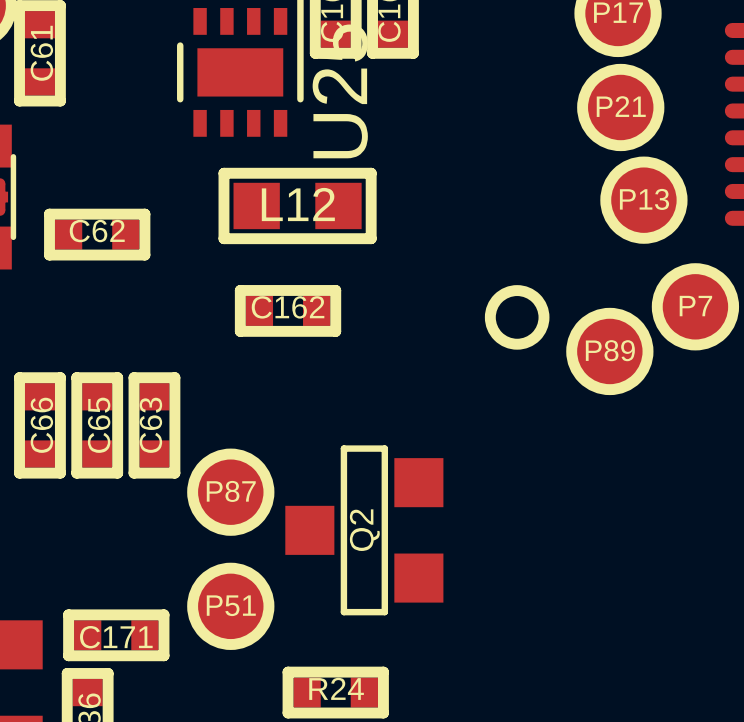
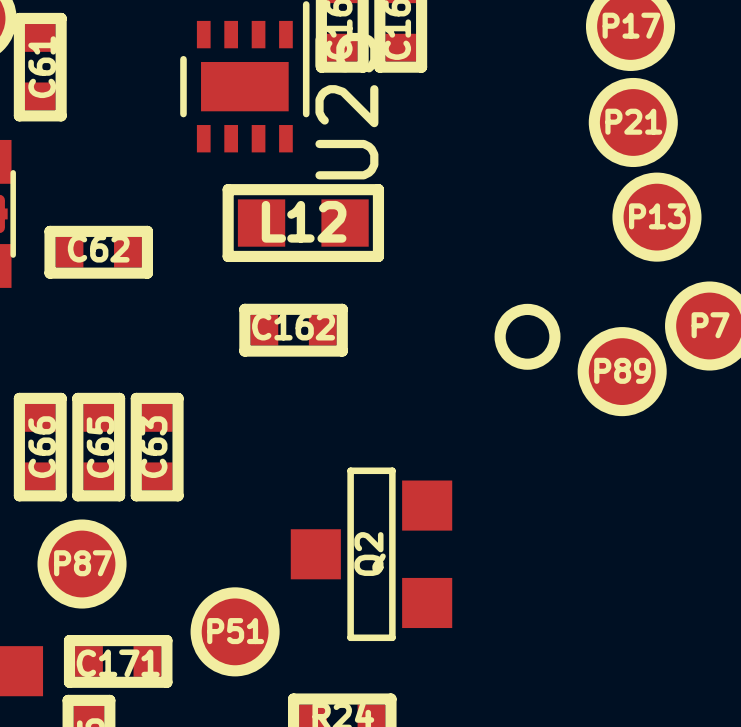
P87 position: (230, 492) -> (82, 564)

